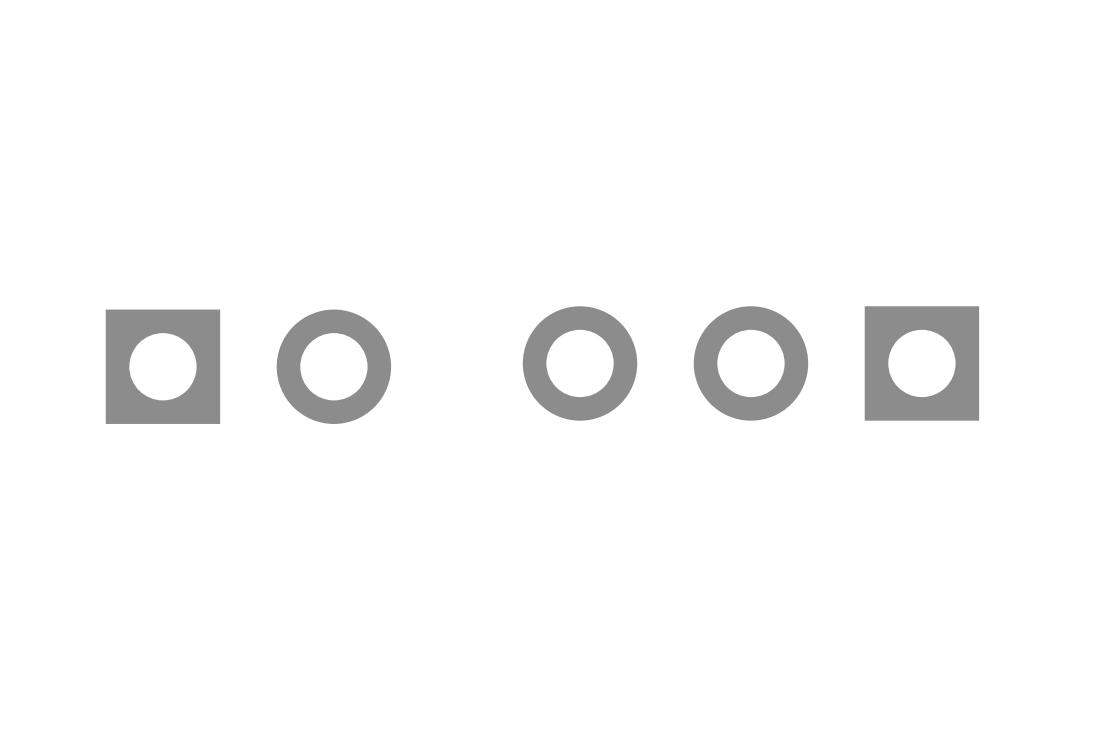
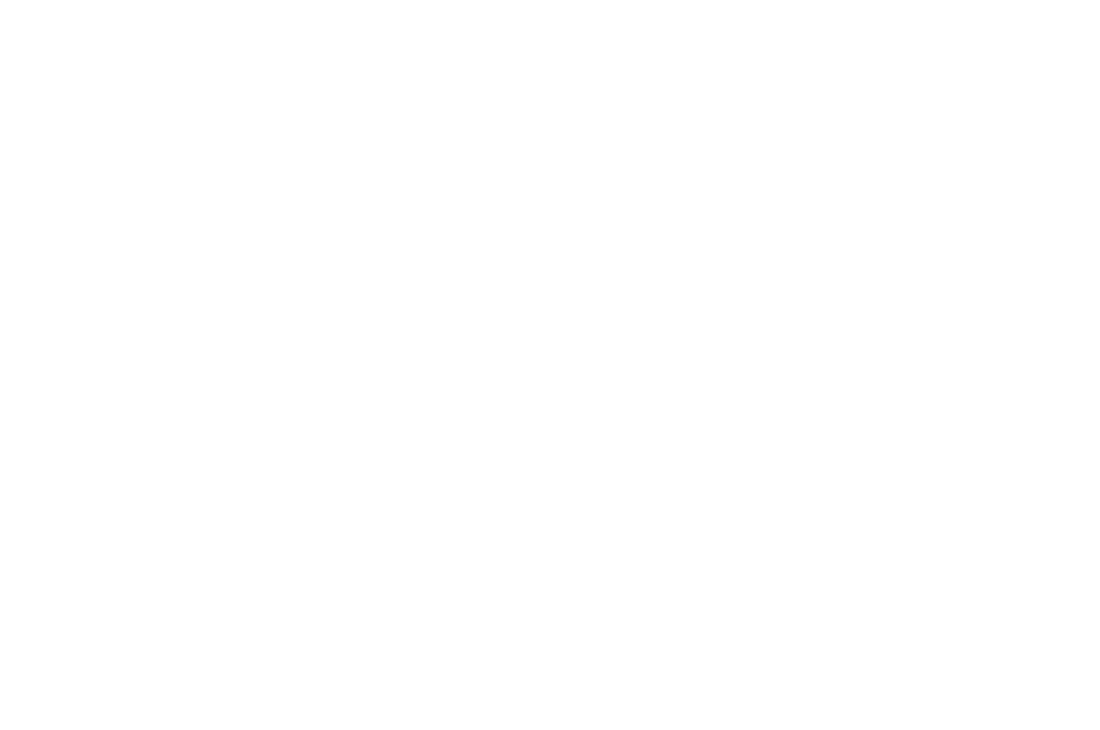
part: (750, 363) -> none
part: (248, 366) -> none

